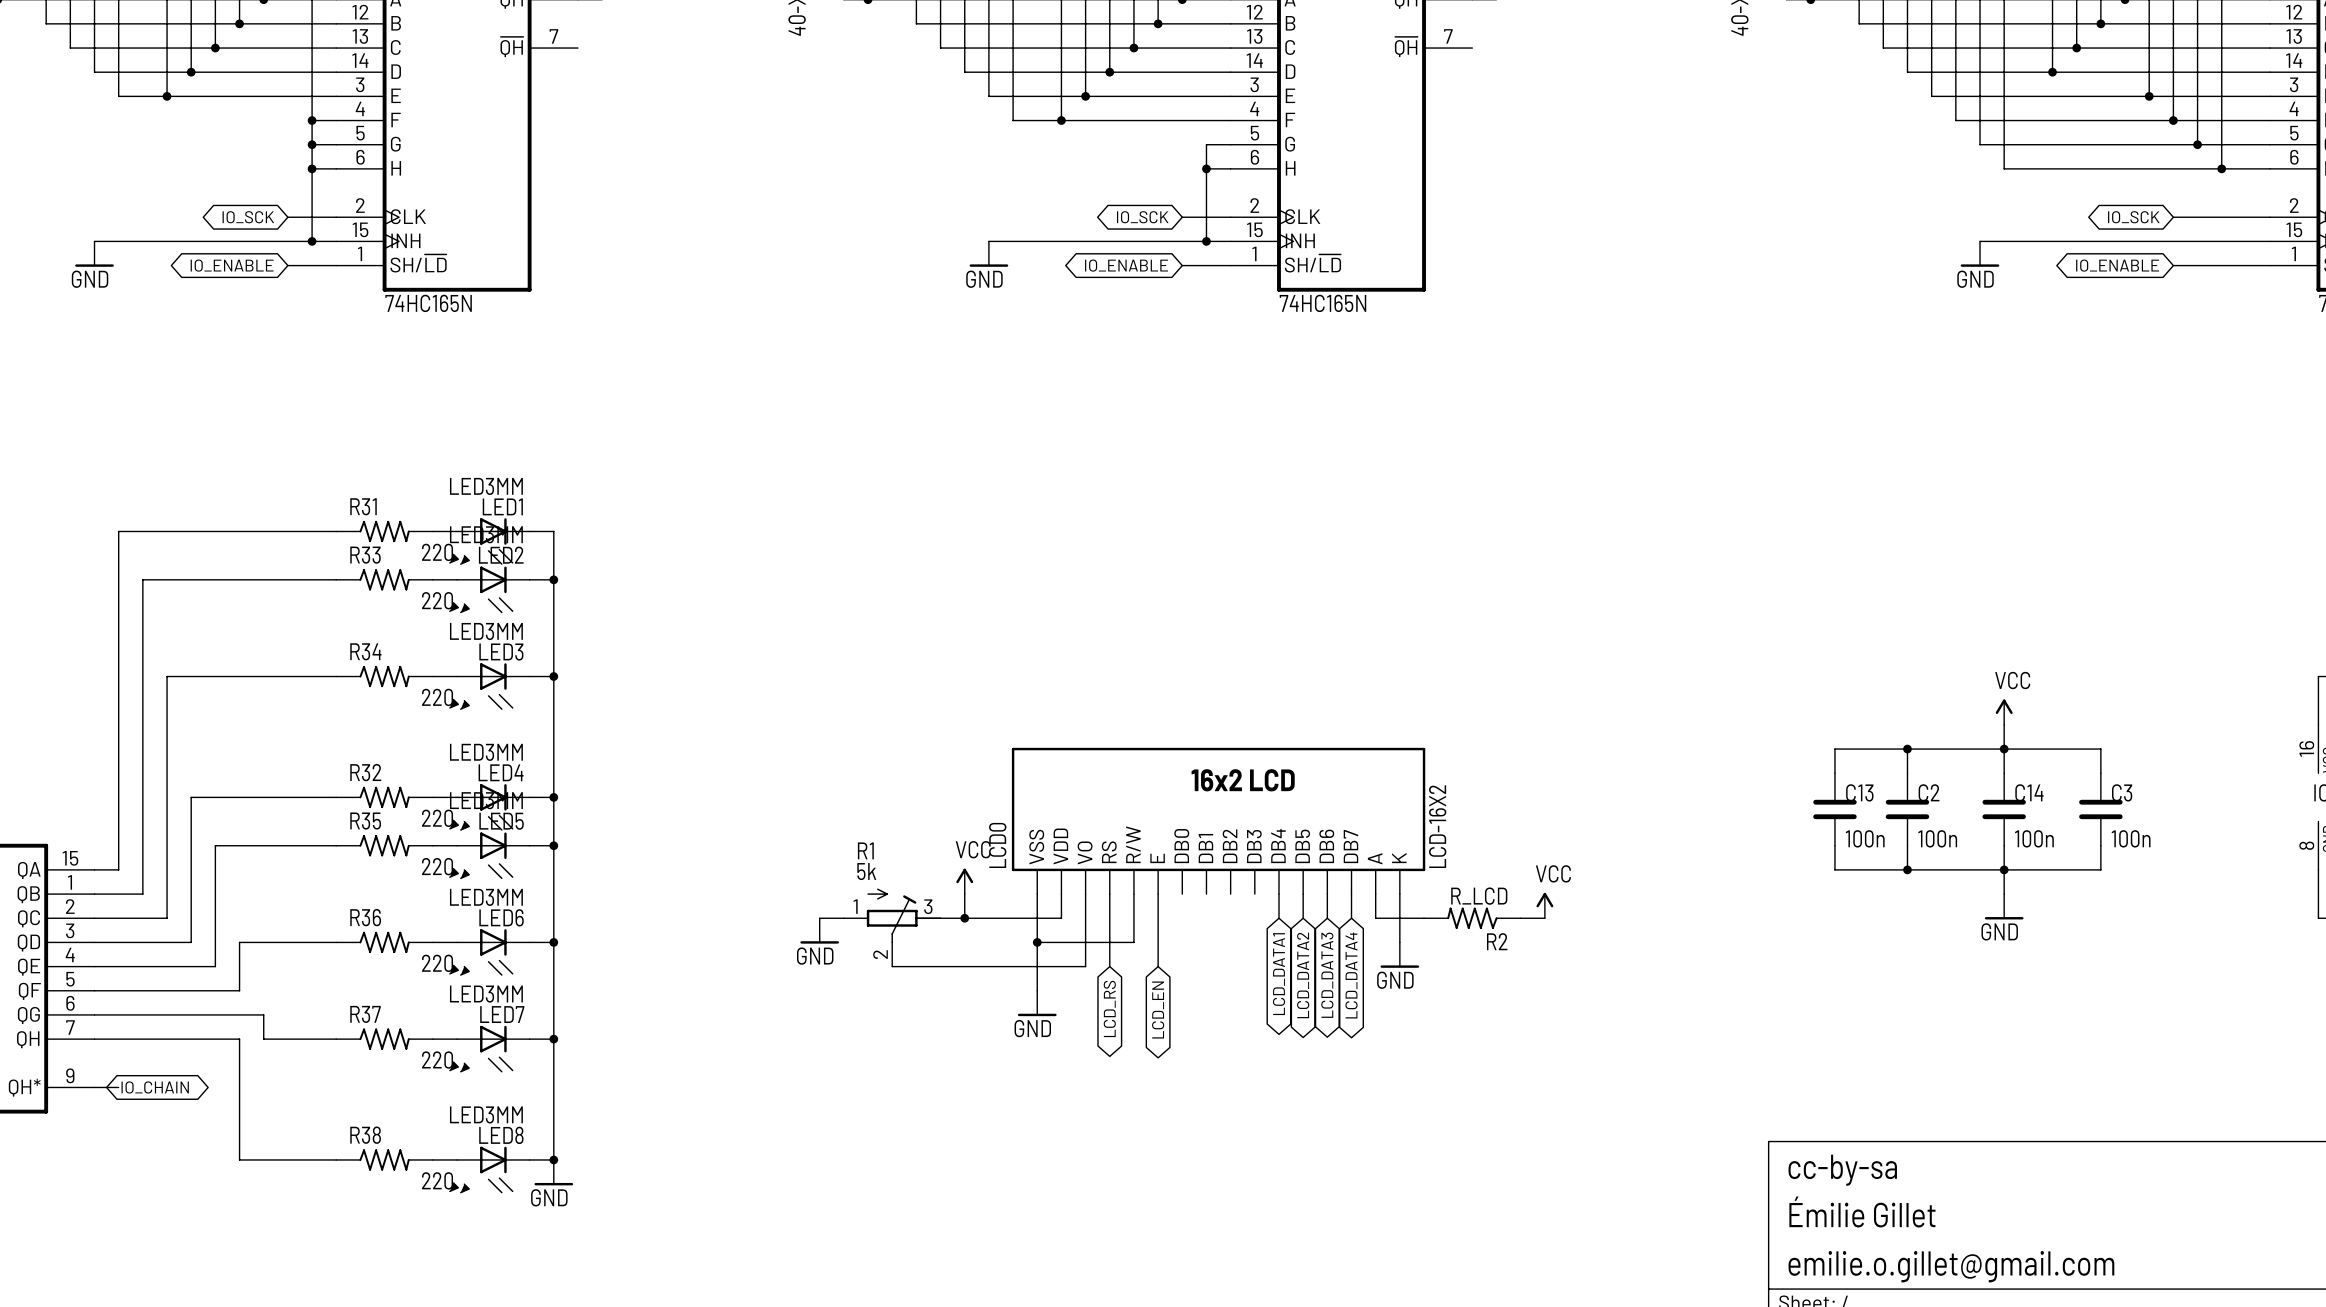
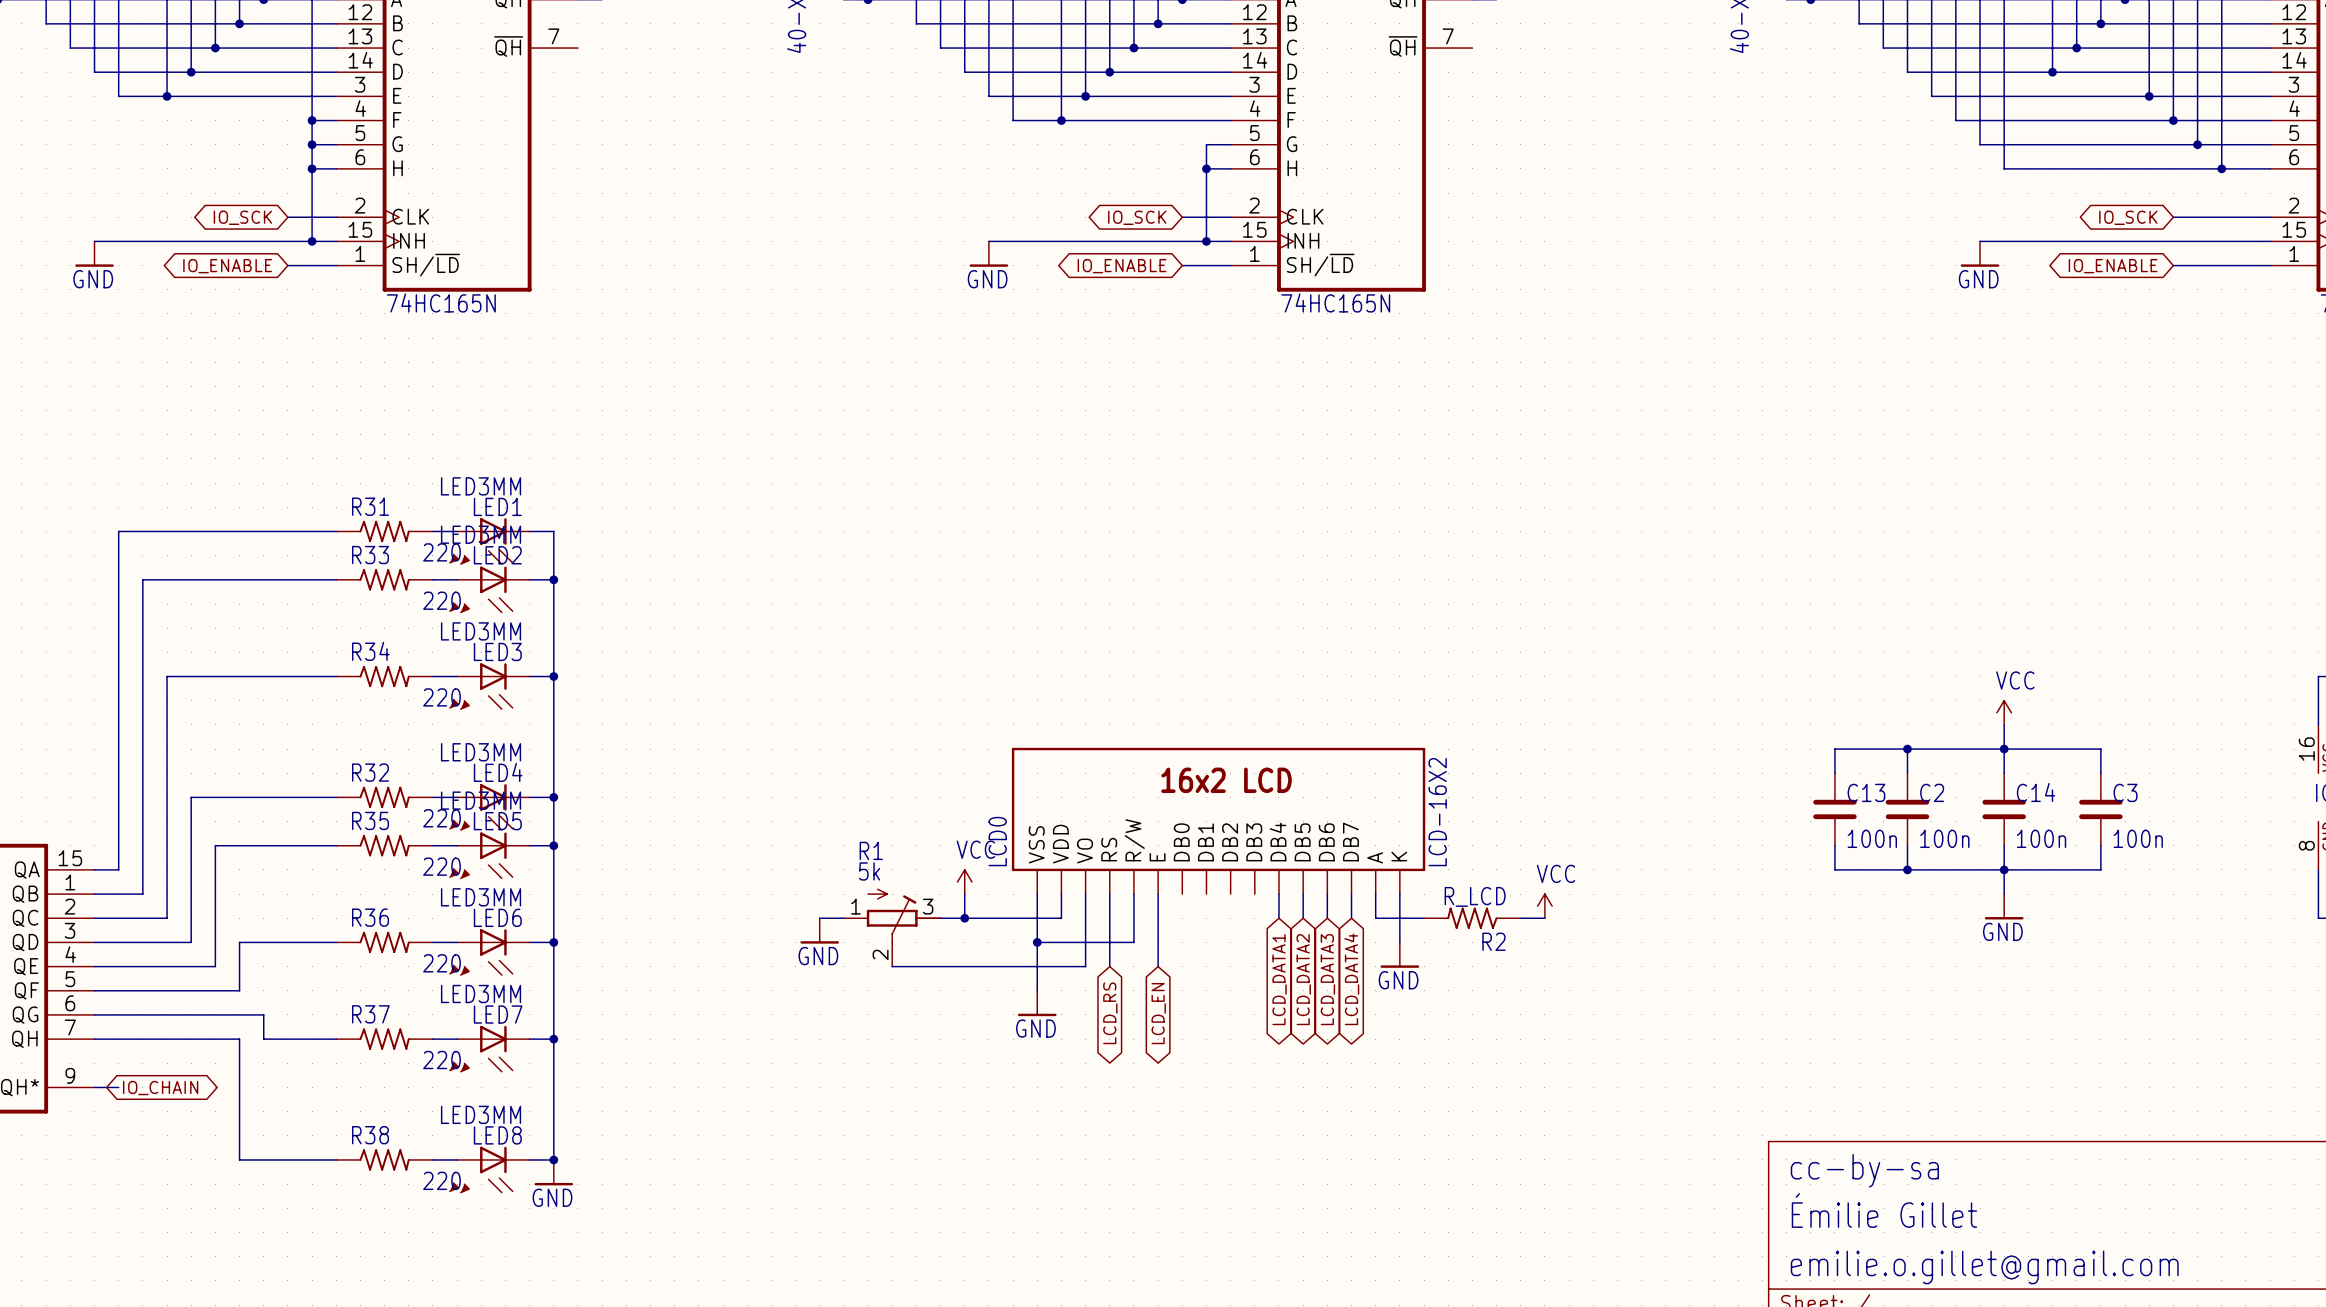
power symbol shape: [1995, 699, 2013, 725] -> [1996, 700, 2012, 725]
power symbol shape: [956, 868, 974, 895] -> [957, 869, 972, 895]
power symbol shape: [1536, 892, 1554, 919] -> [1537, 894, 1553, 919]

